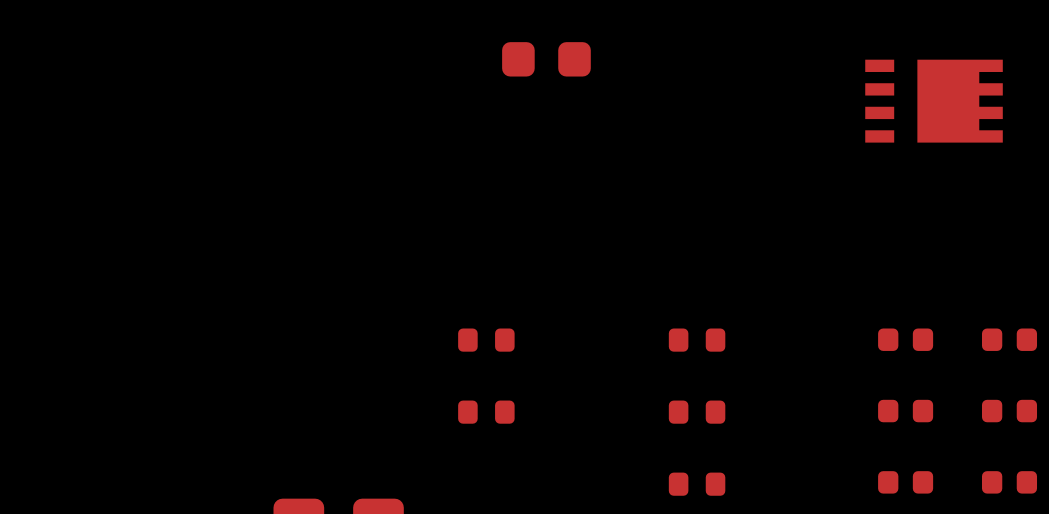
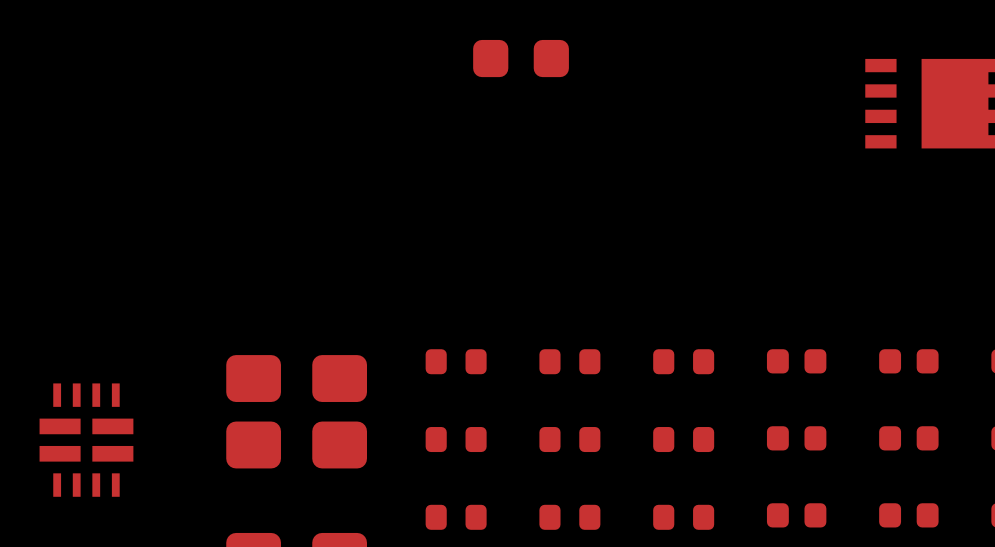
part: none -> (796, 361)
part: none -> (569, 361)
part: none -> (296, 411)
part: none -> (796, 438)
part: none -> (86, 440)
part: none -> (569, 439)
part: none -> (796, 515)
part: none -> (456, 517)
part: none -> (569, 517)

